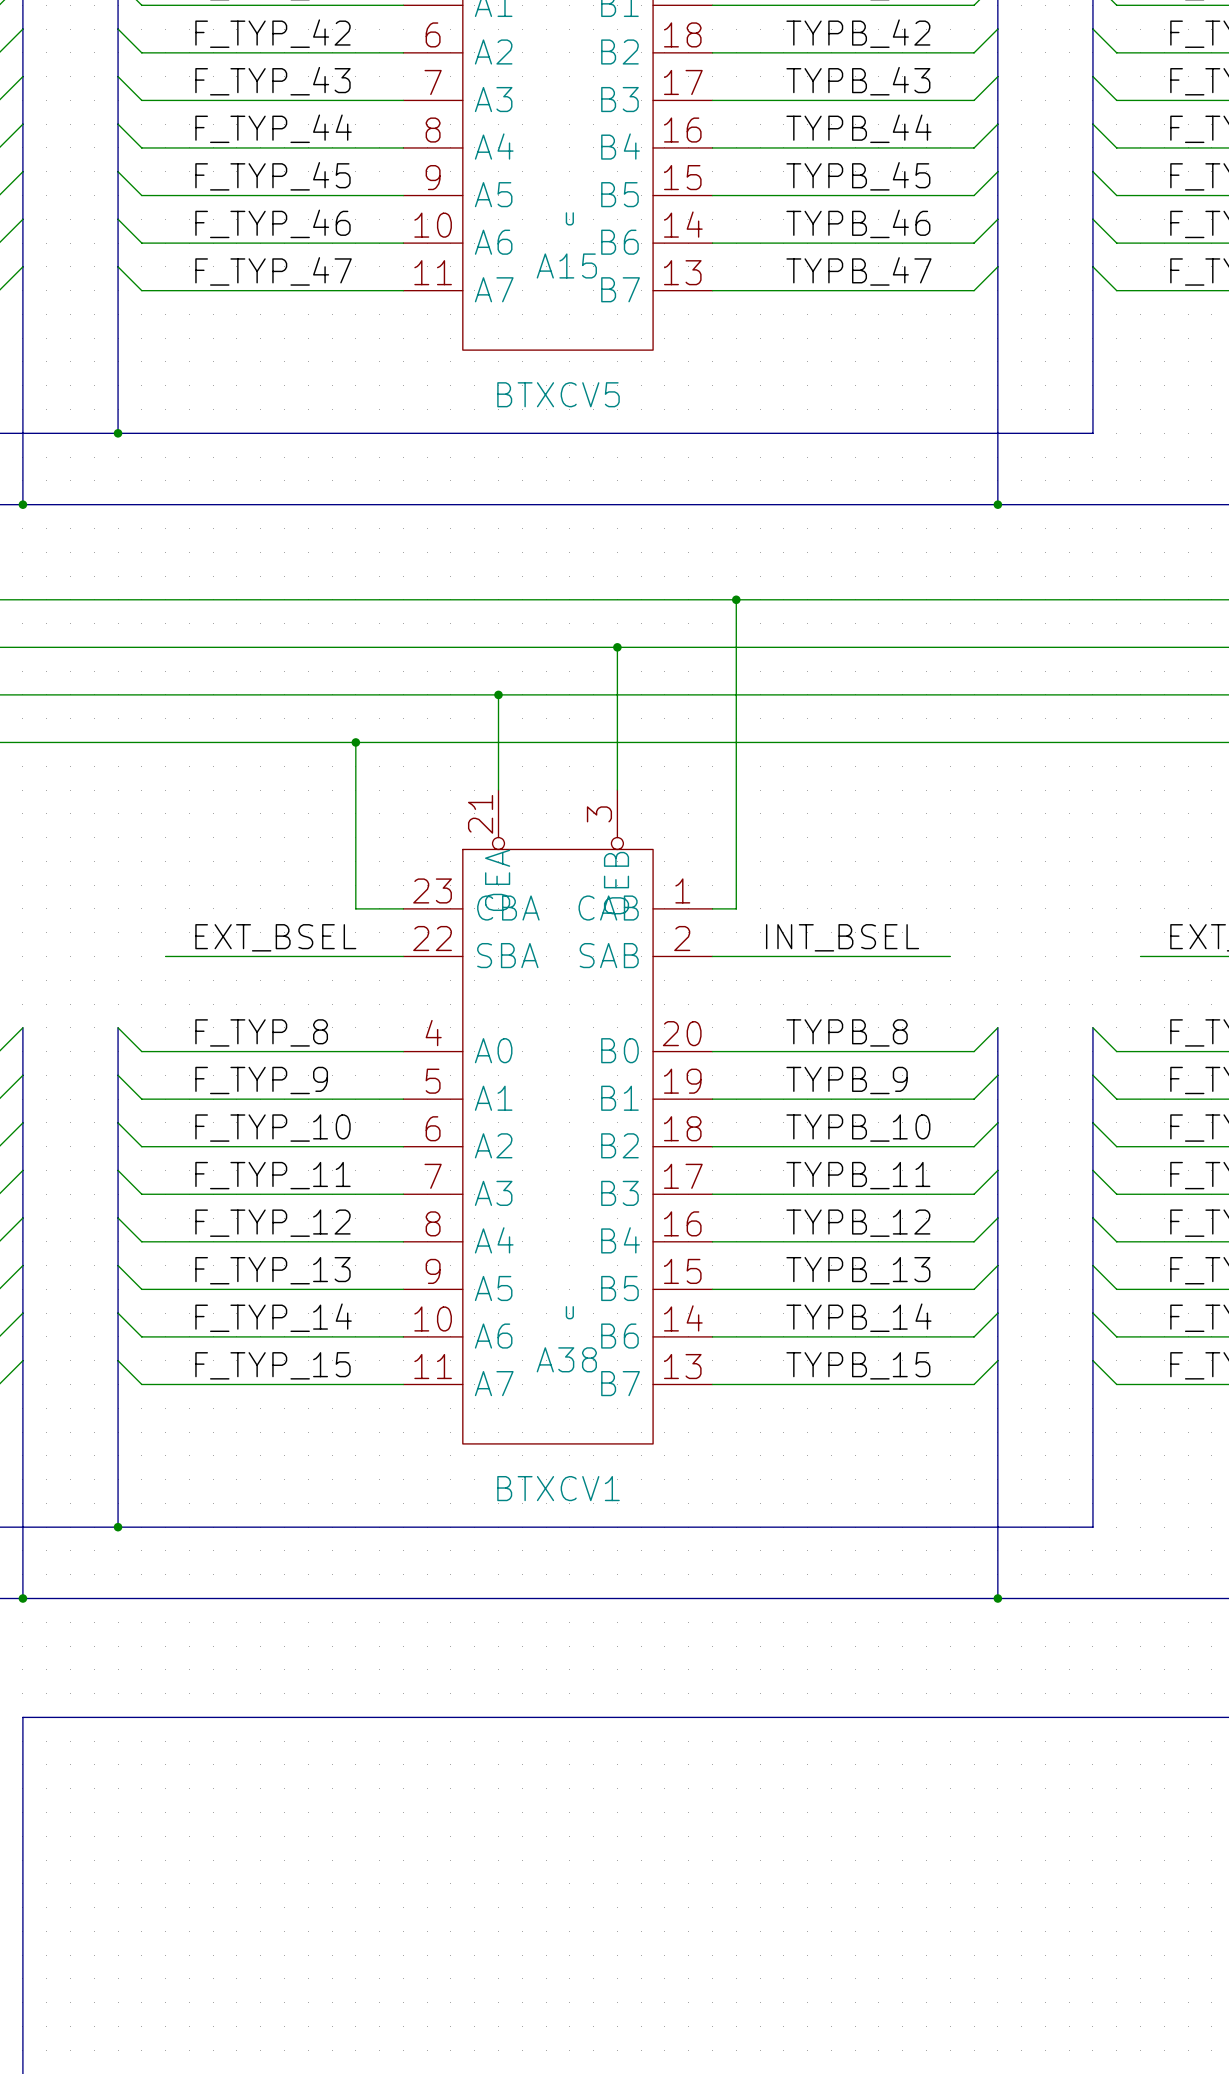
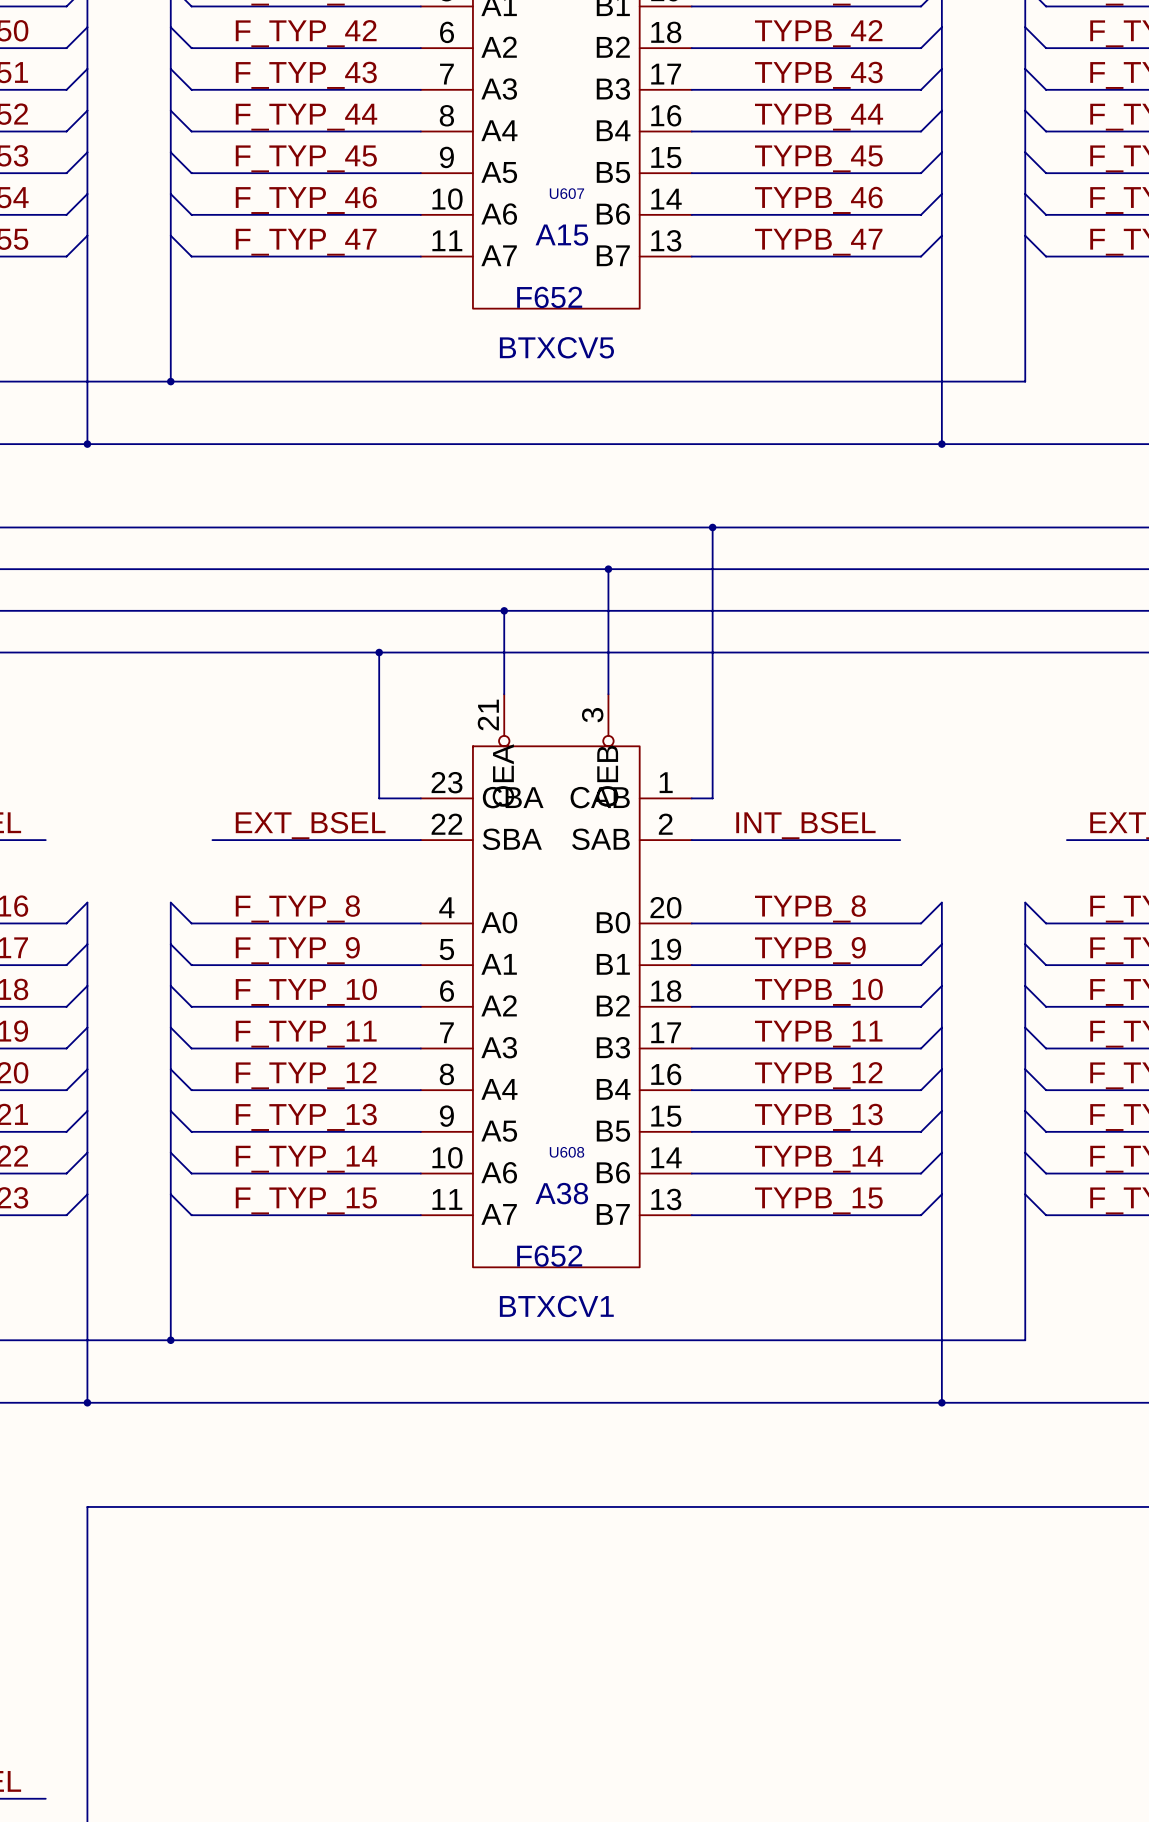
U name: U (569, 218) -> U607 (566, 193)
U value: none -> F652 (549, 297)
U name: U (569, 1312) -> U608 (567, 1152)
U value: none -> F652 (549, 1256)

